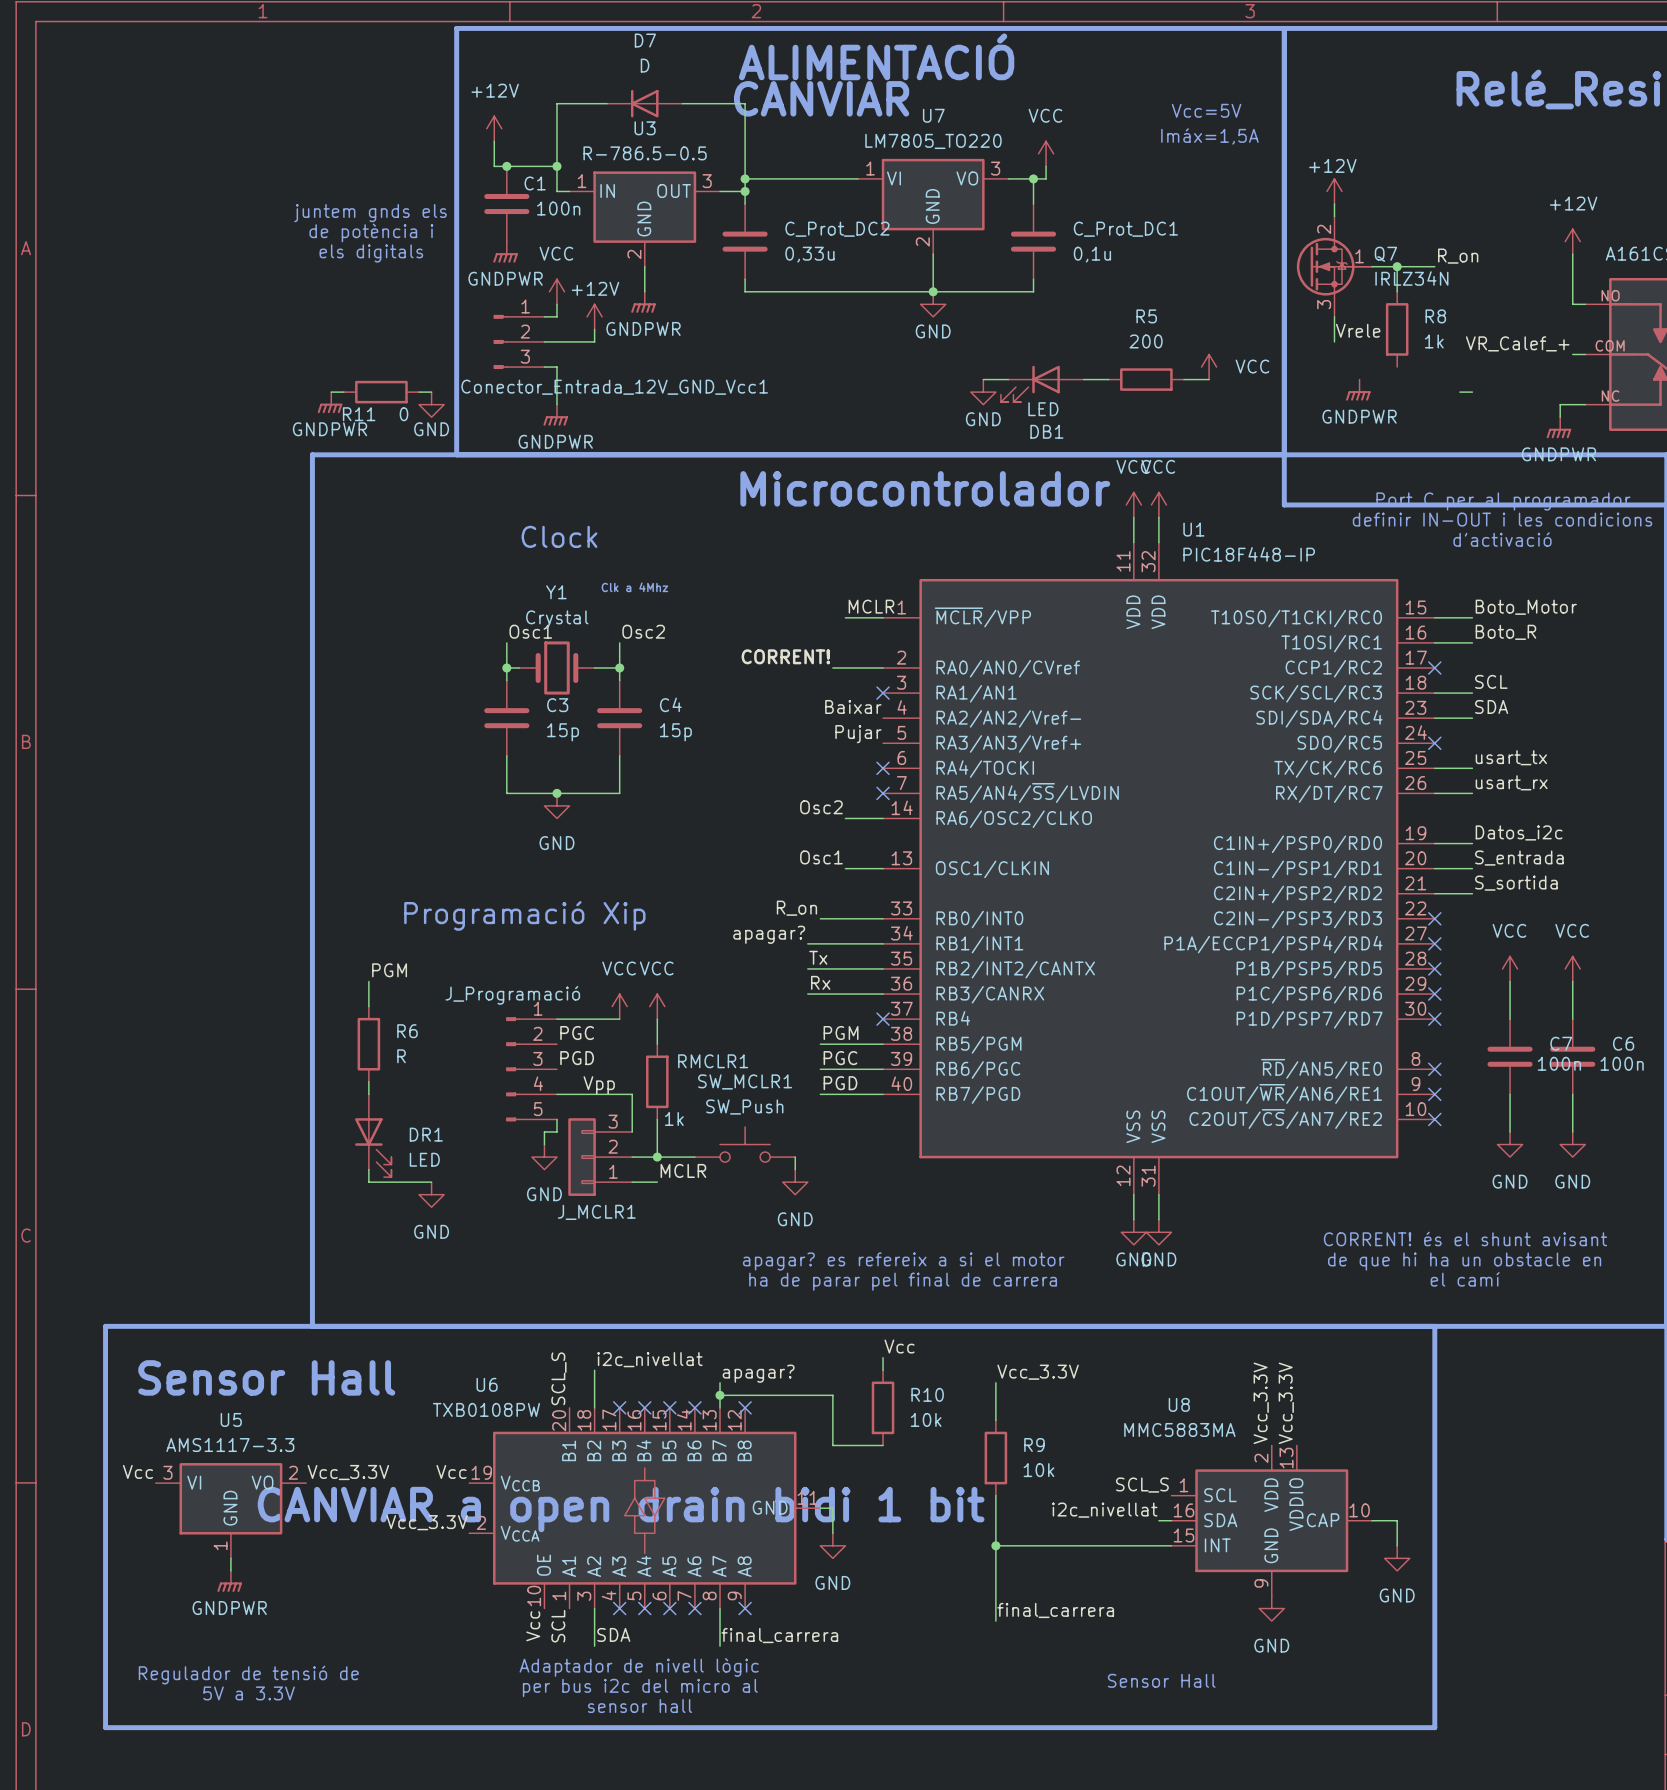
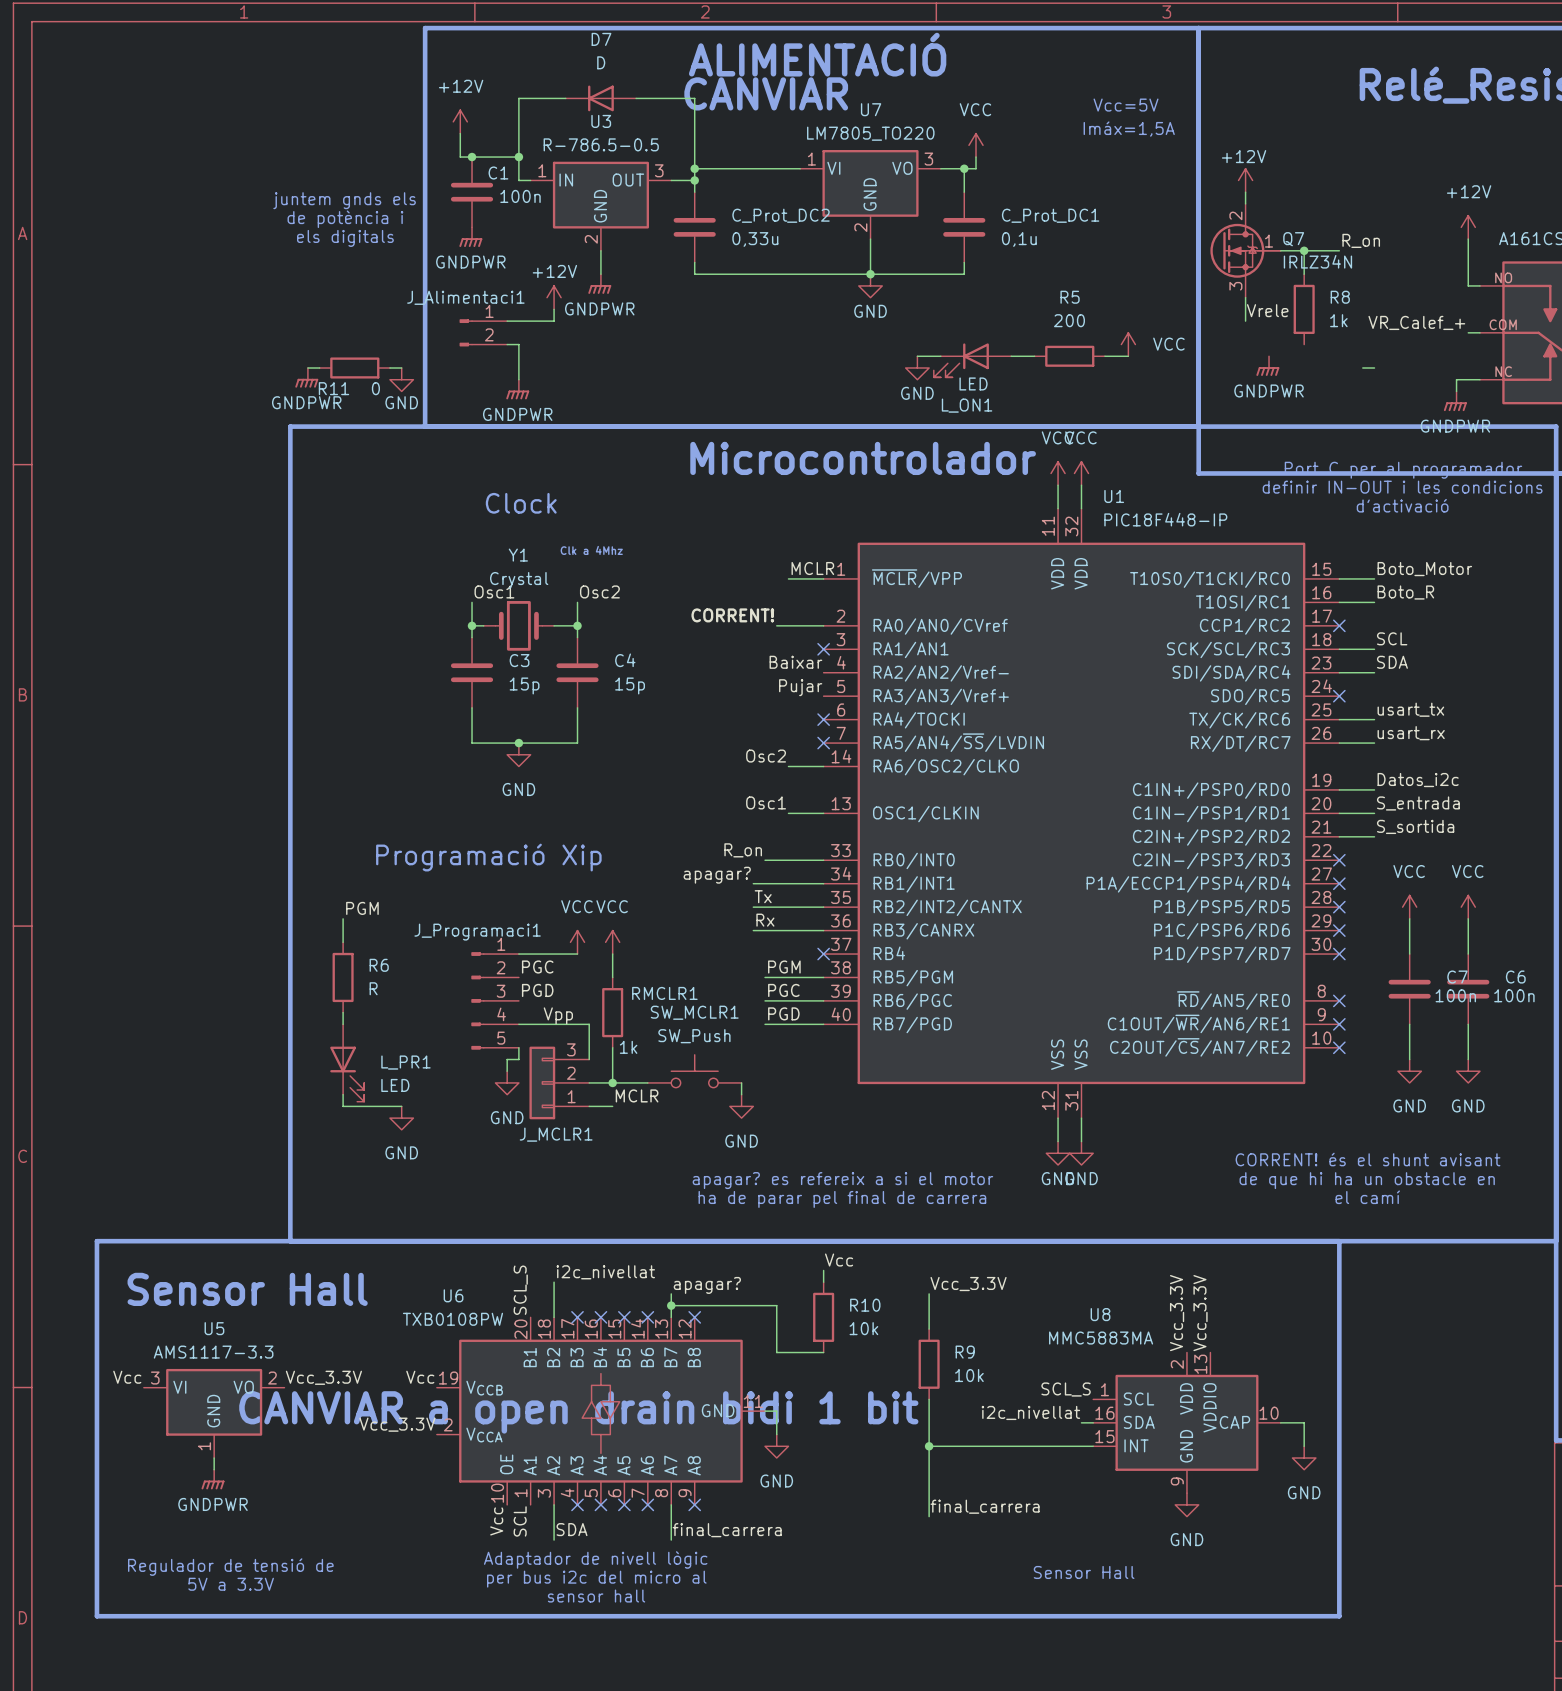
power symbol: VCC (556, 291) -> none
wire: (556, 304) (556, 316) (544, 316) -> none
Conector_Entrada_12V_GND_Vcc1: (518, 341) -> none
J_Alimentaci1: none -> (483, 332)
DB1 name: DB1 (1046, 431) -> L_ON1 (967, 405)
J_Programació name: J_Programació (512, 995) -> J_Programaci1 (477, 932)
DR1 name: DR1 (426, 1134) -> L_PR1 (405, 1062)

